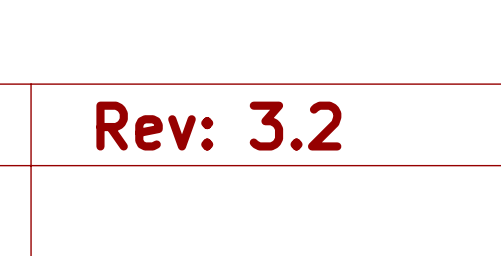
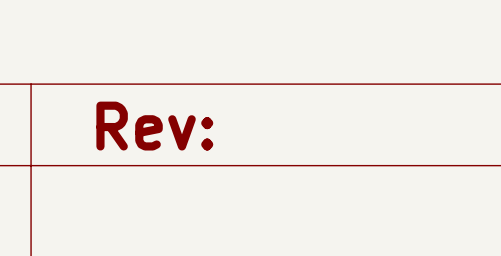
title block: Rev: 3.2 (218, 126) -> Rev: (154, 126)

